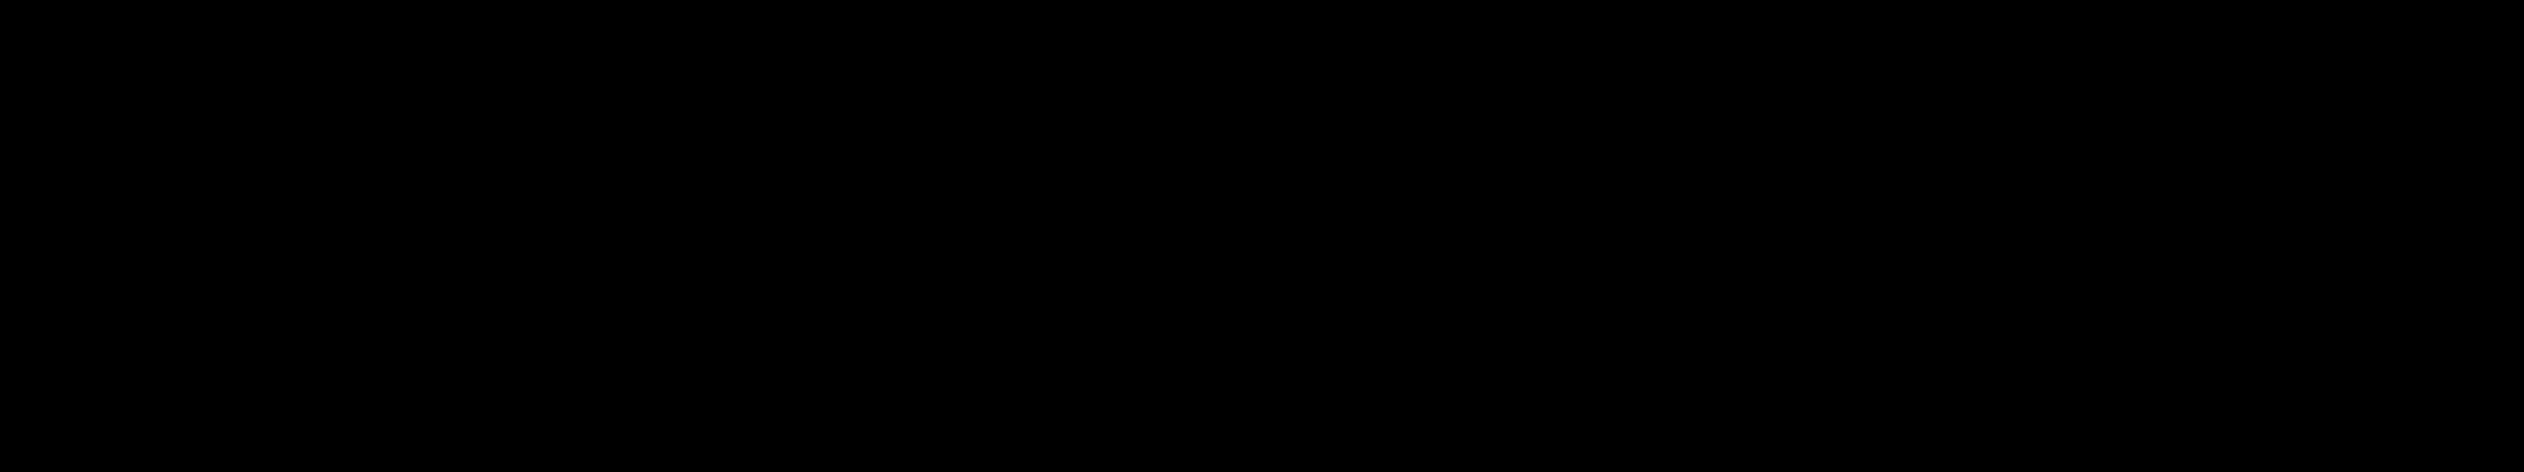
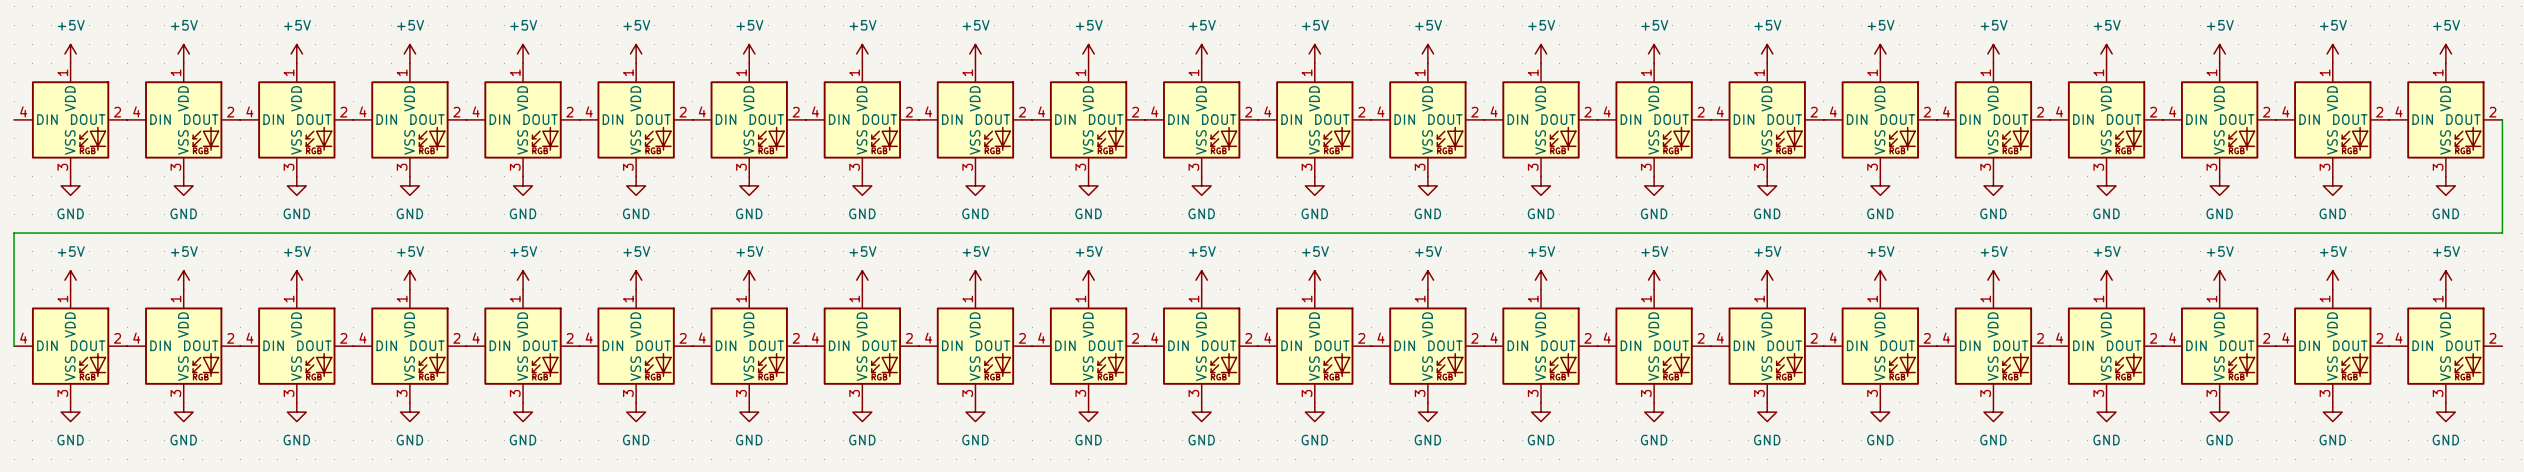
power symbol: none -> +5V (70, 53)
power symbol: none -> +5V (183, 53)
power symbol: none -> +5V (296, 53)
power symbol: none -> +5V (409, 53)
power symbol: none -> +5V (523, 53)
power symbol: none -> +5V (636, 53)
power symbol: none -> +5V (749, 53)
power symbol: none -> +5V (862, 53)
power symbol: none -> +5V (975, 53)
power symbol: none -> +5V (1088, 53)
power symbol: none -> +5V (1201, 53)
power symbol: none -> +5V (1314, 53)
power symbol: none -> +5V (1427, 53)
power symbol: none -> +5V (1541, 53)
power symbol: none -> +5V (1654, 53)
power symbol: none -> +5V (1767, 53)
power symbol: none -> +5V (1880, 53)
power symbol: none -> +5V (1993, 53)
power symbol: none -> +5V (2106, 53)
power symbol: none -> +5V (2219, 53)
power symbol: none -> +5V (2332, 53)
power symbol: none -> +5V (2445, 53)
part: none -> (70, 119)
part: none -> (183, 119)
part: none -> (296, 119)
part: none -> (409, 119)
part: none -> (523, 119)
part: none -> (636, 119)
part: none -> (749, 119)
part: none -> (862, 119)
part: none -> (975, 119)
part: none -> (1088, 119)
part: none -> (1201, 119)
part: none -> (1314, 119)
part: none -> (1427, 119)
part: none -> (1541, 119)
part: none -> (1654, 119)
part: none -> (1767, 119)
part: none -> (1880, 119)
part: none -> (1993, 119)
part: none -> (2106, 119)
part: none -> (2219, 119)
part: none -> (2332, 119)
part: none -> (2445, 119)
wire: none -> (2502, 119) (2502, 233) (14, 233) (14, 346)
power symbol: none -> GND (70, 185)
power symbol: none -> GND (183, 185)
power symbol: none -> GND (296, 185)
power symbol: none -> GND (409, 185)
power symbol: none -> GND (523, 185)
power symbol: none -> GND (636, 185)
power symbol: none -> GND (749, 185)
power symbol: none -> GND (862, 185)
power symbol: none -> GND (975, 185)
power symbol: none -> GND (1088, 185)
power symbol: none -> GND (1201, 185)
power symbol: none -> GND (1314, 185)
power symbol: none -> GND (1427, 185)
power symbol: none -> GND (1541, 185)
power symbol: none -> GND (1654, 185)
power symbol: none -> GND (1767, 185)
power symbol: none -> GND (1880, 185)
power symbol: none -> GND (1993, 185)
power symbol: none -> GND (2106, 185)
power symbol: none -> GND (2219, 185)
power symbol: none -> GND (2332, 185)
power symbol: none -> GND (2445, 185)
power symbol: none -> +5V (70, 280)
power symbol: none -> +5V (183, 280)
power symbol: none -> +5V (296, 280)
power symbol: none -> +5V (409, 280)
power symbol: none -> +5V (523, 280)
power symbol: none -> +5V (636, 280)
power symbol: none -> +5V (749, 280)
power symbol: none -> +5V (862, 280)
power symbol: none -> +5V (975, 280)
power symbol: none -> +5V (1088, 280)
power symbol: none -> +5V (1201, 280)
power symbol: none -> +5V (1314, 280)
power symbol: none -> +5V (1427, 280)
power symbol: none -> +5V (1541, 280)
power symbol: none -> +5V (1654, 280)
power symbol: none -> +5V (1767, 280)
power symbol: none -> +5V (1880, 280)
power symbol: none -> +5V (1993, 280)
power symbol: none -> +5V (2106, 280)
power symbol: none -> +5V (2219, 280)
power symbol: none -> +5V (2332, 280)
power symbol: none -> +5V (2445, 280)
part: none -> (70, 346)
part: none -> (183, 346)
part: none -> (296, 346)
part: none -> (409, 346)
part: none -> (523, 346)
part: none -> (636, 346)
part: none -> (749, 346)
part: none -> (862, 346)
part: none -> (975, 346)
part: none -> (1088, 346)
part: none -> (1201, 346)
part: none -> (1314, 346)
part: none -> (1427, 346)
part: none -> (1541, 346)
part: none -> (1654, 346)
part: none -> (1767, 346)
part: none -> (1880, 346)
part: none -> (1993, 346)
part: none -> (2106, 346)
part: none -> (2219, 346)
part: none -> (2332, 346)
part: none -> (2445, 346)
power symbol: none -> GND (70, 412)
power symbol: none -> GND (183, 412)
power symbol: none -> GND (296, 412)
power symbol: none -> GND (409, 412)
power symbol: none -> GND (523, 412)
power symbol: none -> GND (636, 412)
power symbol: none -> GND (749, 412)
power symbol: none -> GND (862, 412)
power symbol: none -> GND (975, 412)
power symbol: none -> GND (1088, 412)
power symbol: none -> GND (1201, 412)
power symbol: none -> GND (1314, 412)
power symbol: none -> GND (1427, 412)
power symbol: none -> GND (1541, 412)
power symbol: none -> GND (1654, 412)
power symbol: none -> GND (1767, 412)
power symbol: none -> GND (1880, 412)
power symbol: none -> GND (1993, 412)
power symbol: none -> GND (2106, 412)
power symbol: none -> GND (2219, 412)
power symbol: none -> GND (2332, 412)
power symbol: none -> GND (2445, 412)

